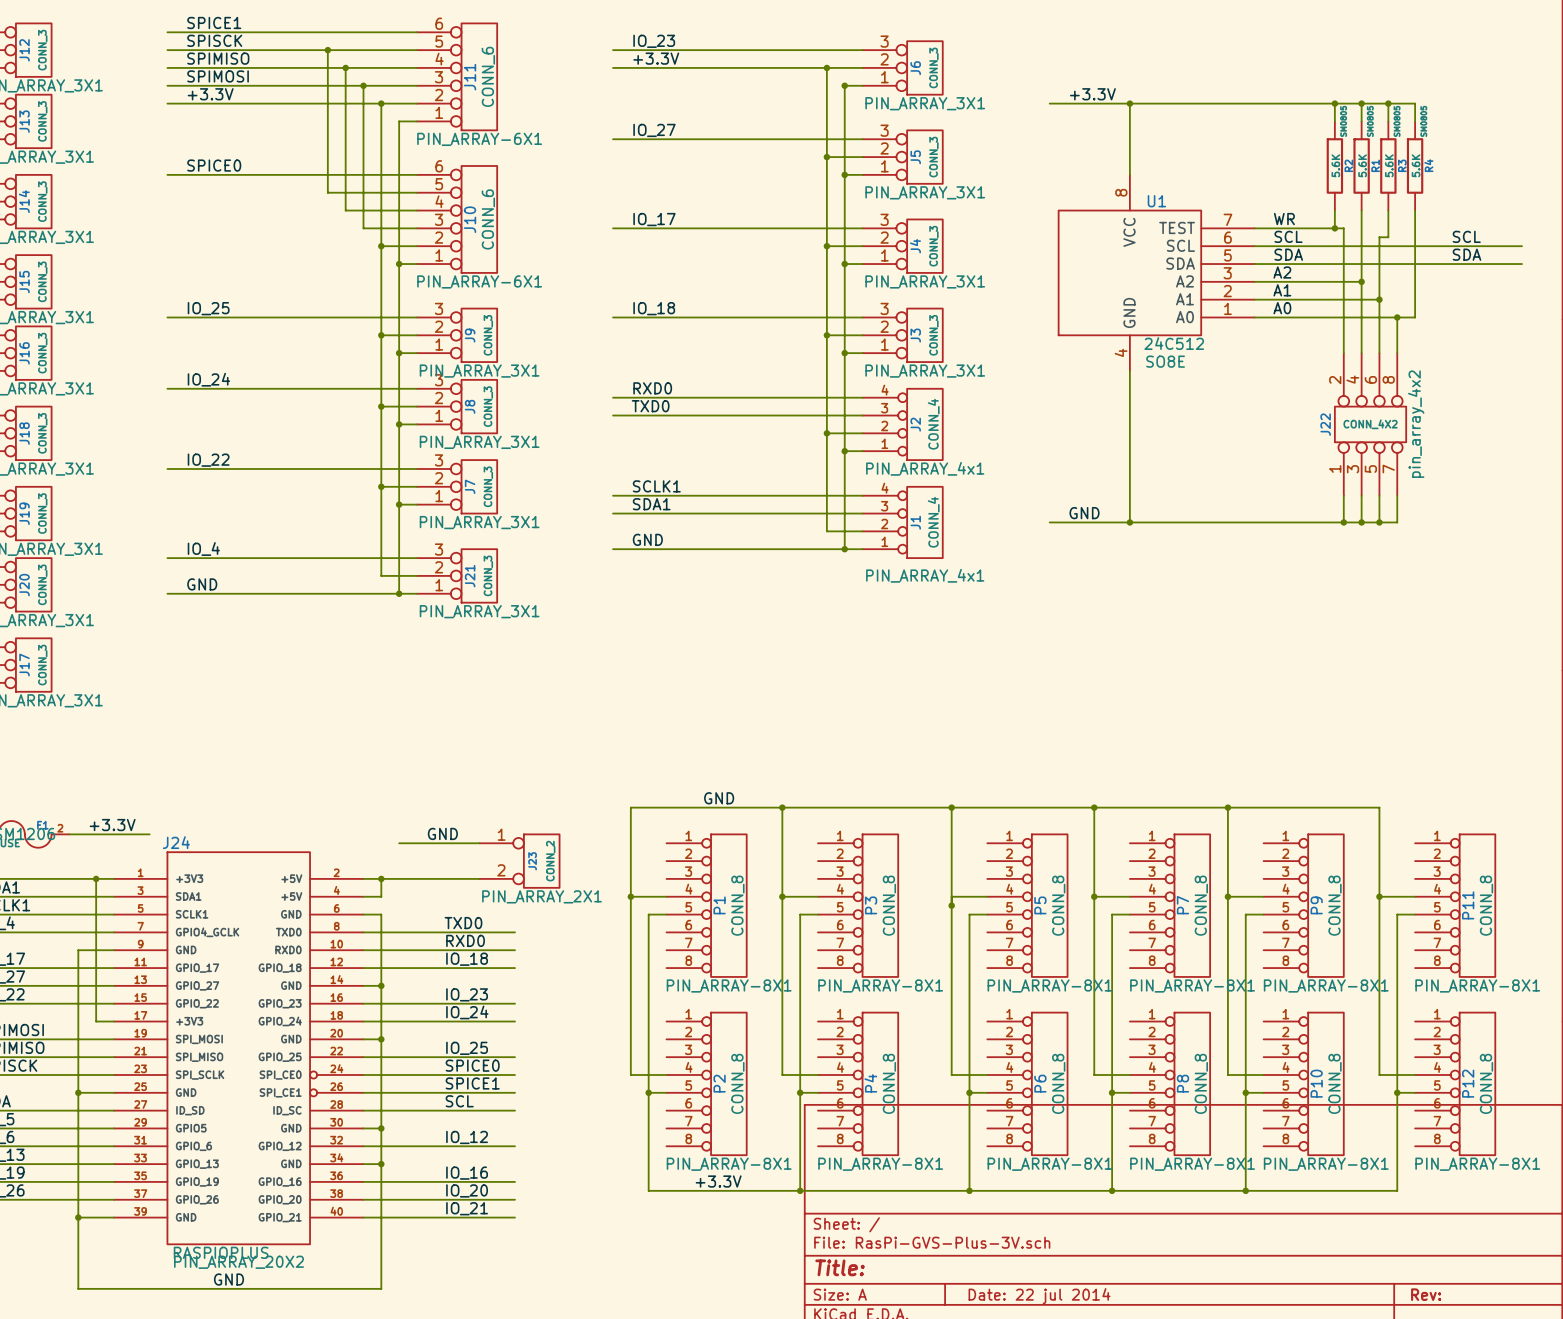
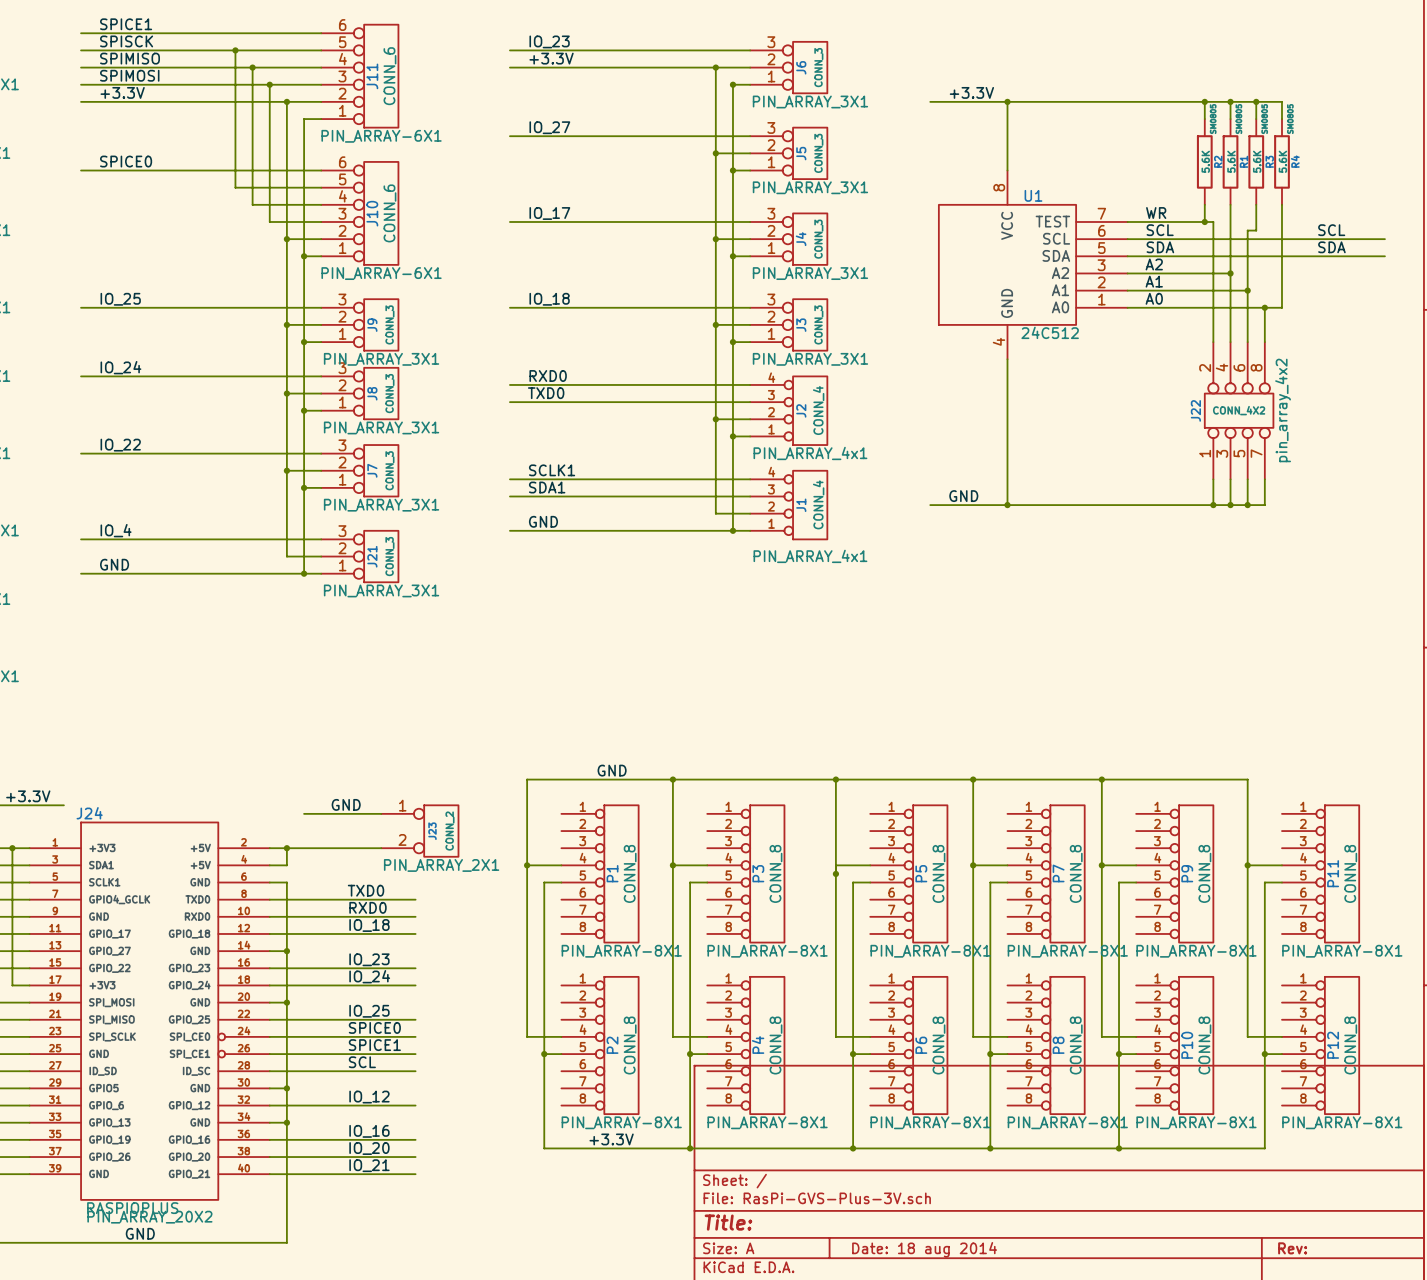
U1 text: SO8E (1165, 361) -> none
title block: Date: 22 jul 2014 (1039, 1296) -> Date: 18 aug 2014 (924, 1249)

